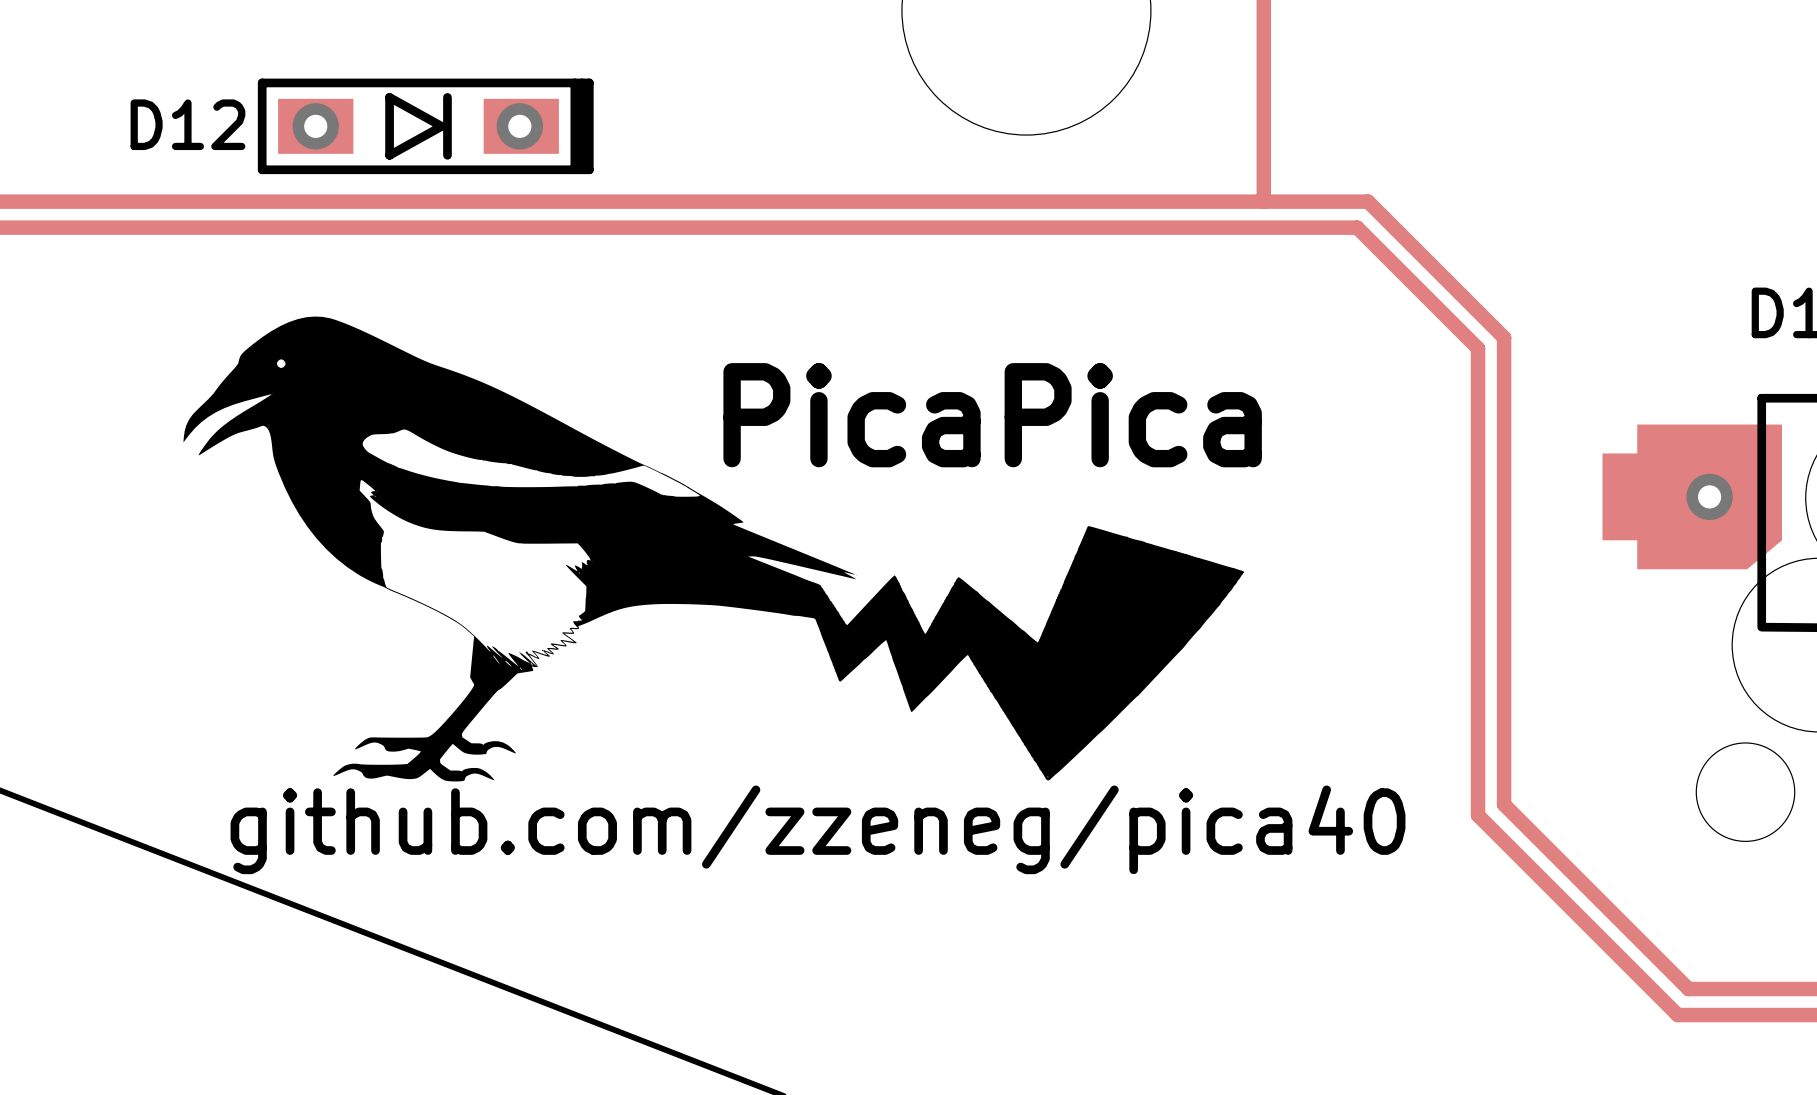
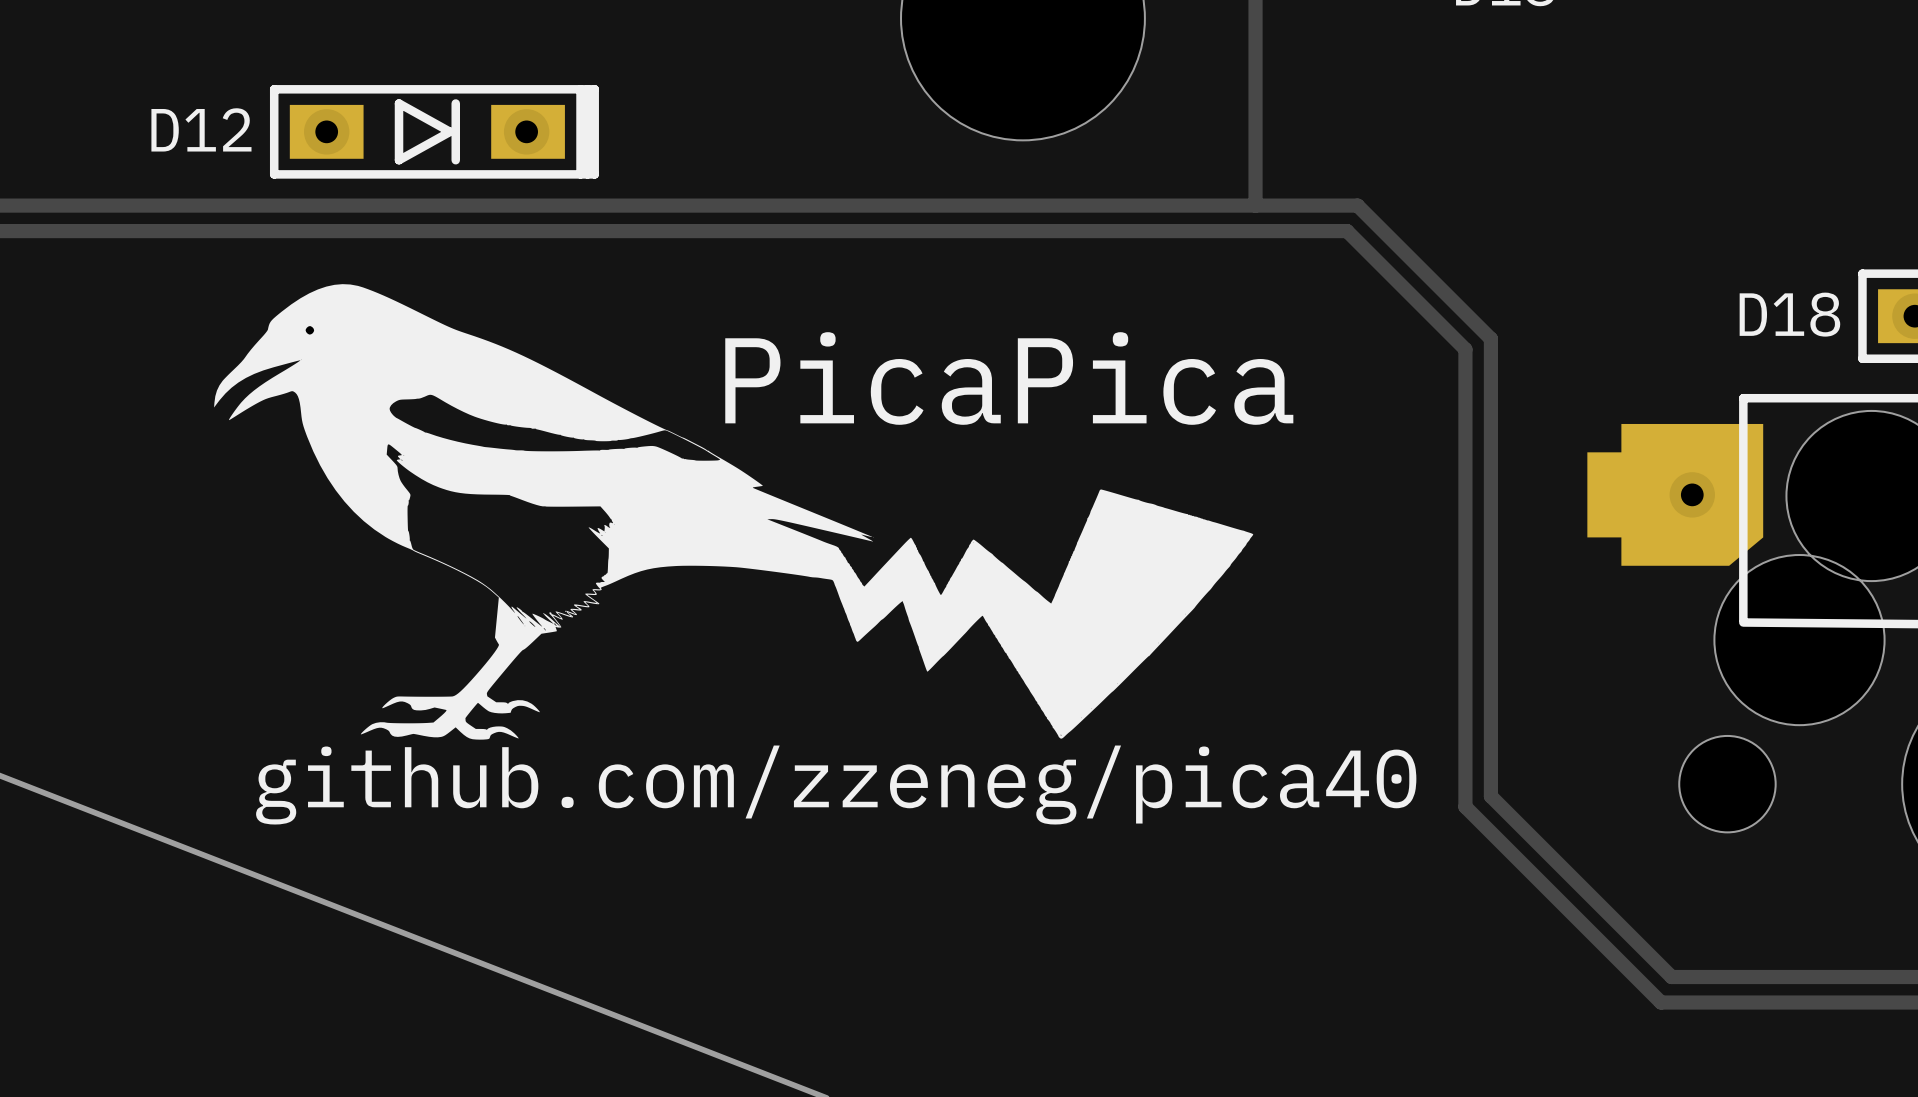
text position: PicaPica (992, 415) -> PicaPica (1009, 378)
drawing position: (713, 549) -> (733, 511)
text position: github.com/zzeneg/pica40 (818, 829) -> github.com/zzeneg/pica40 (836, 785)

